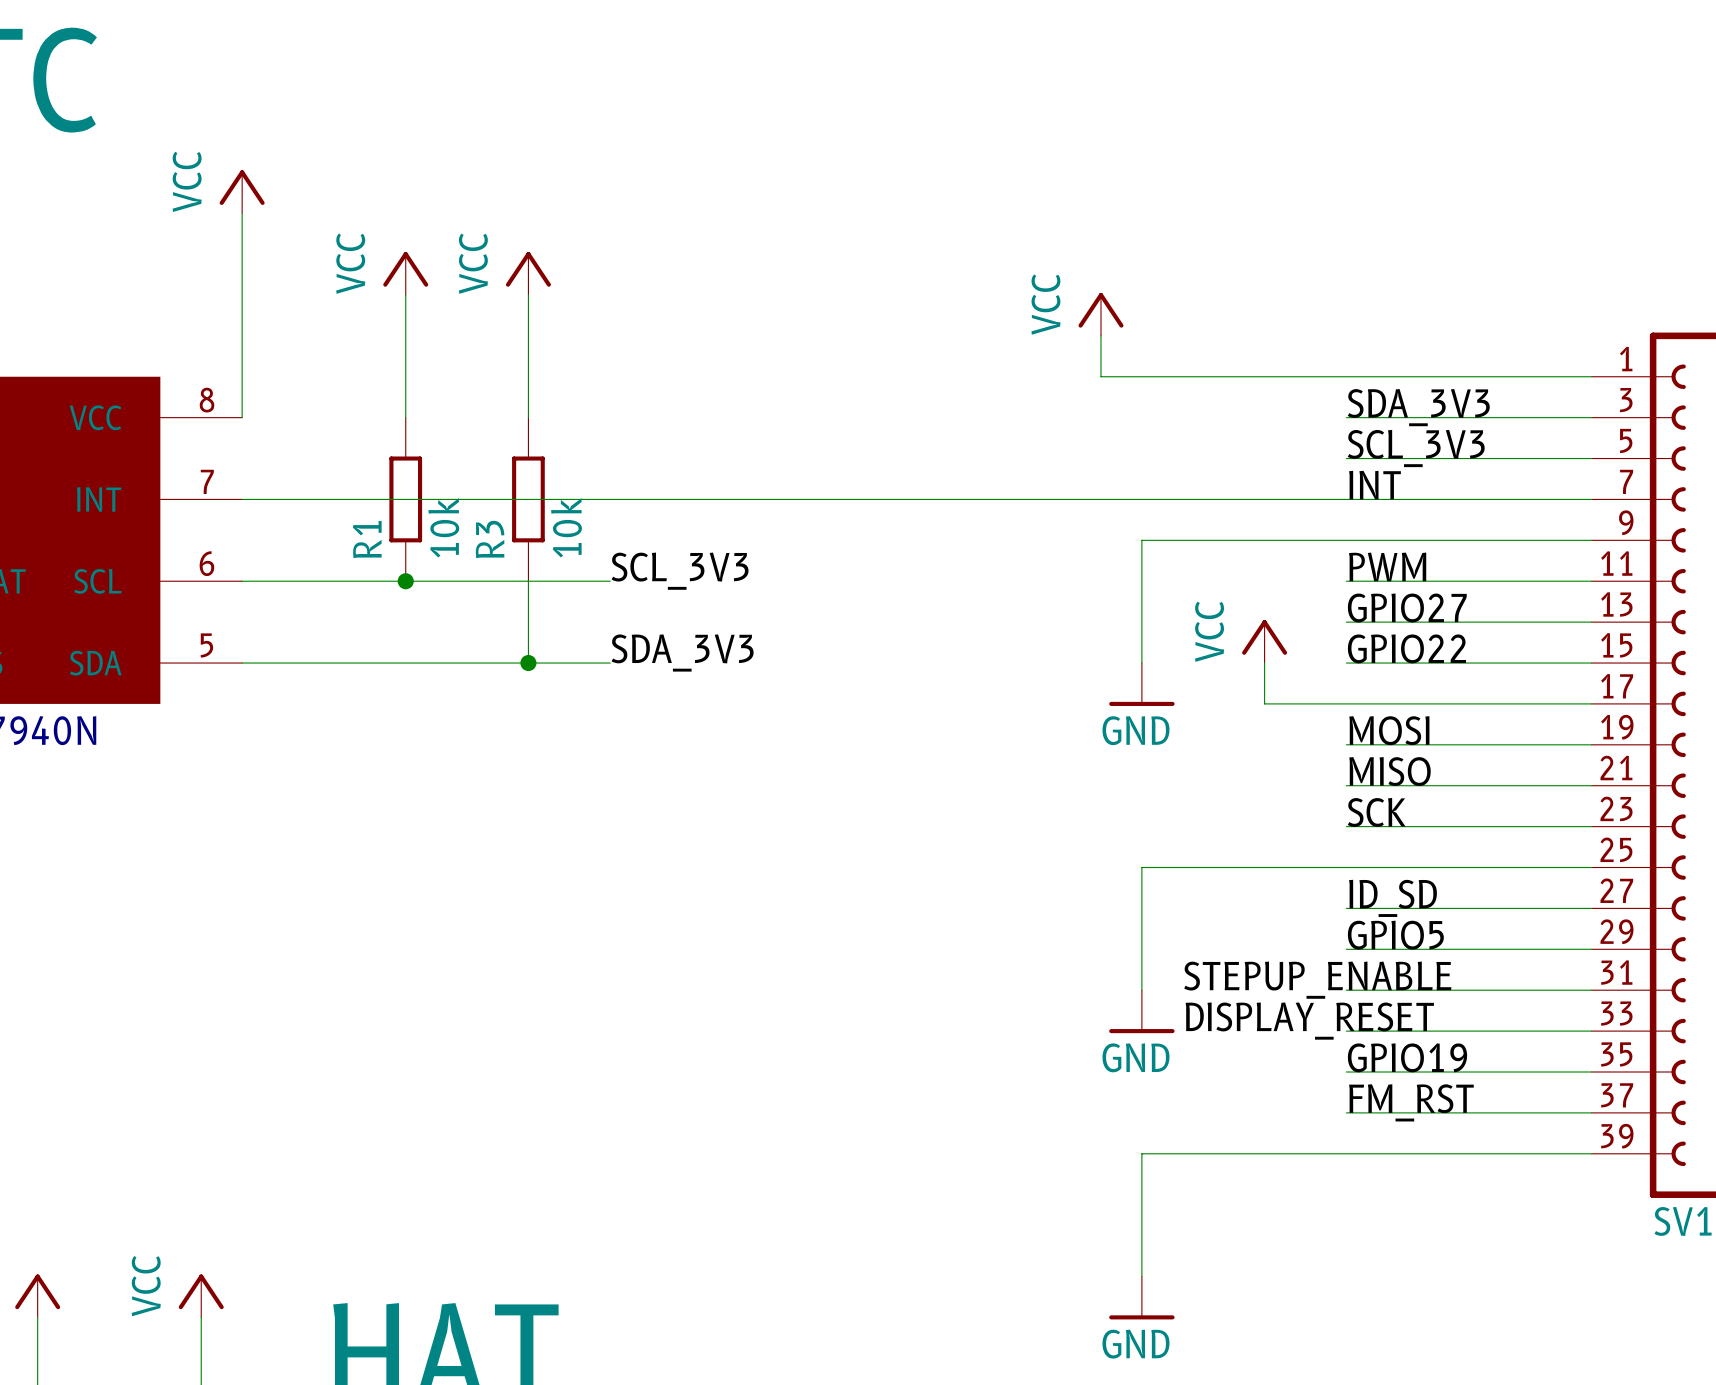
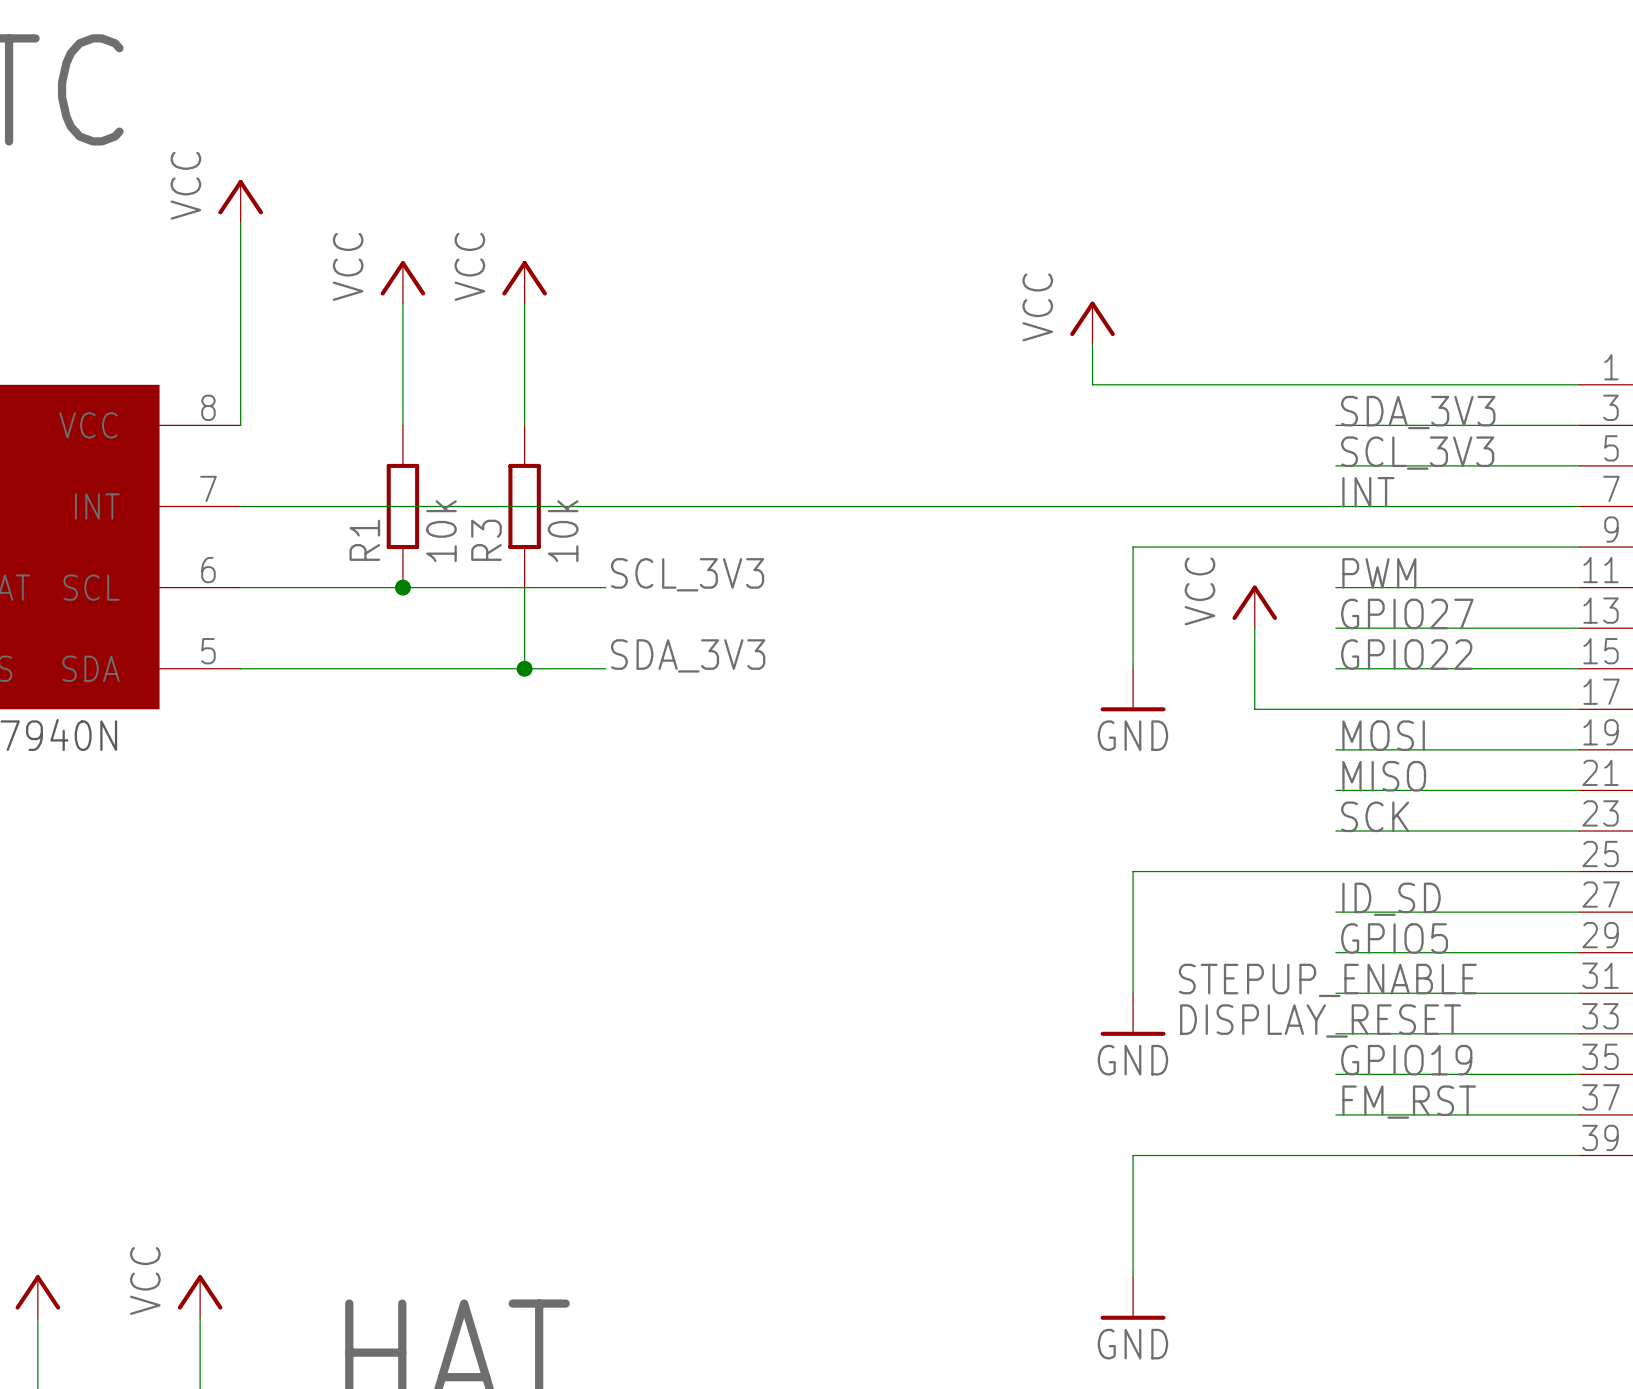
power symbol position: VCC (1264, 641) -> VCC (1254, 606)

